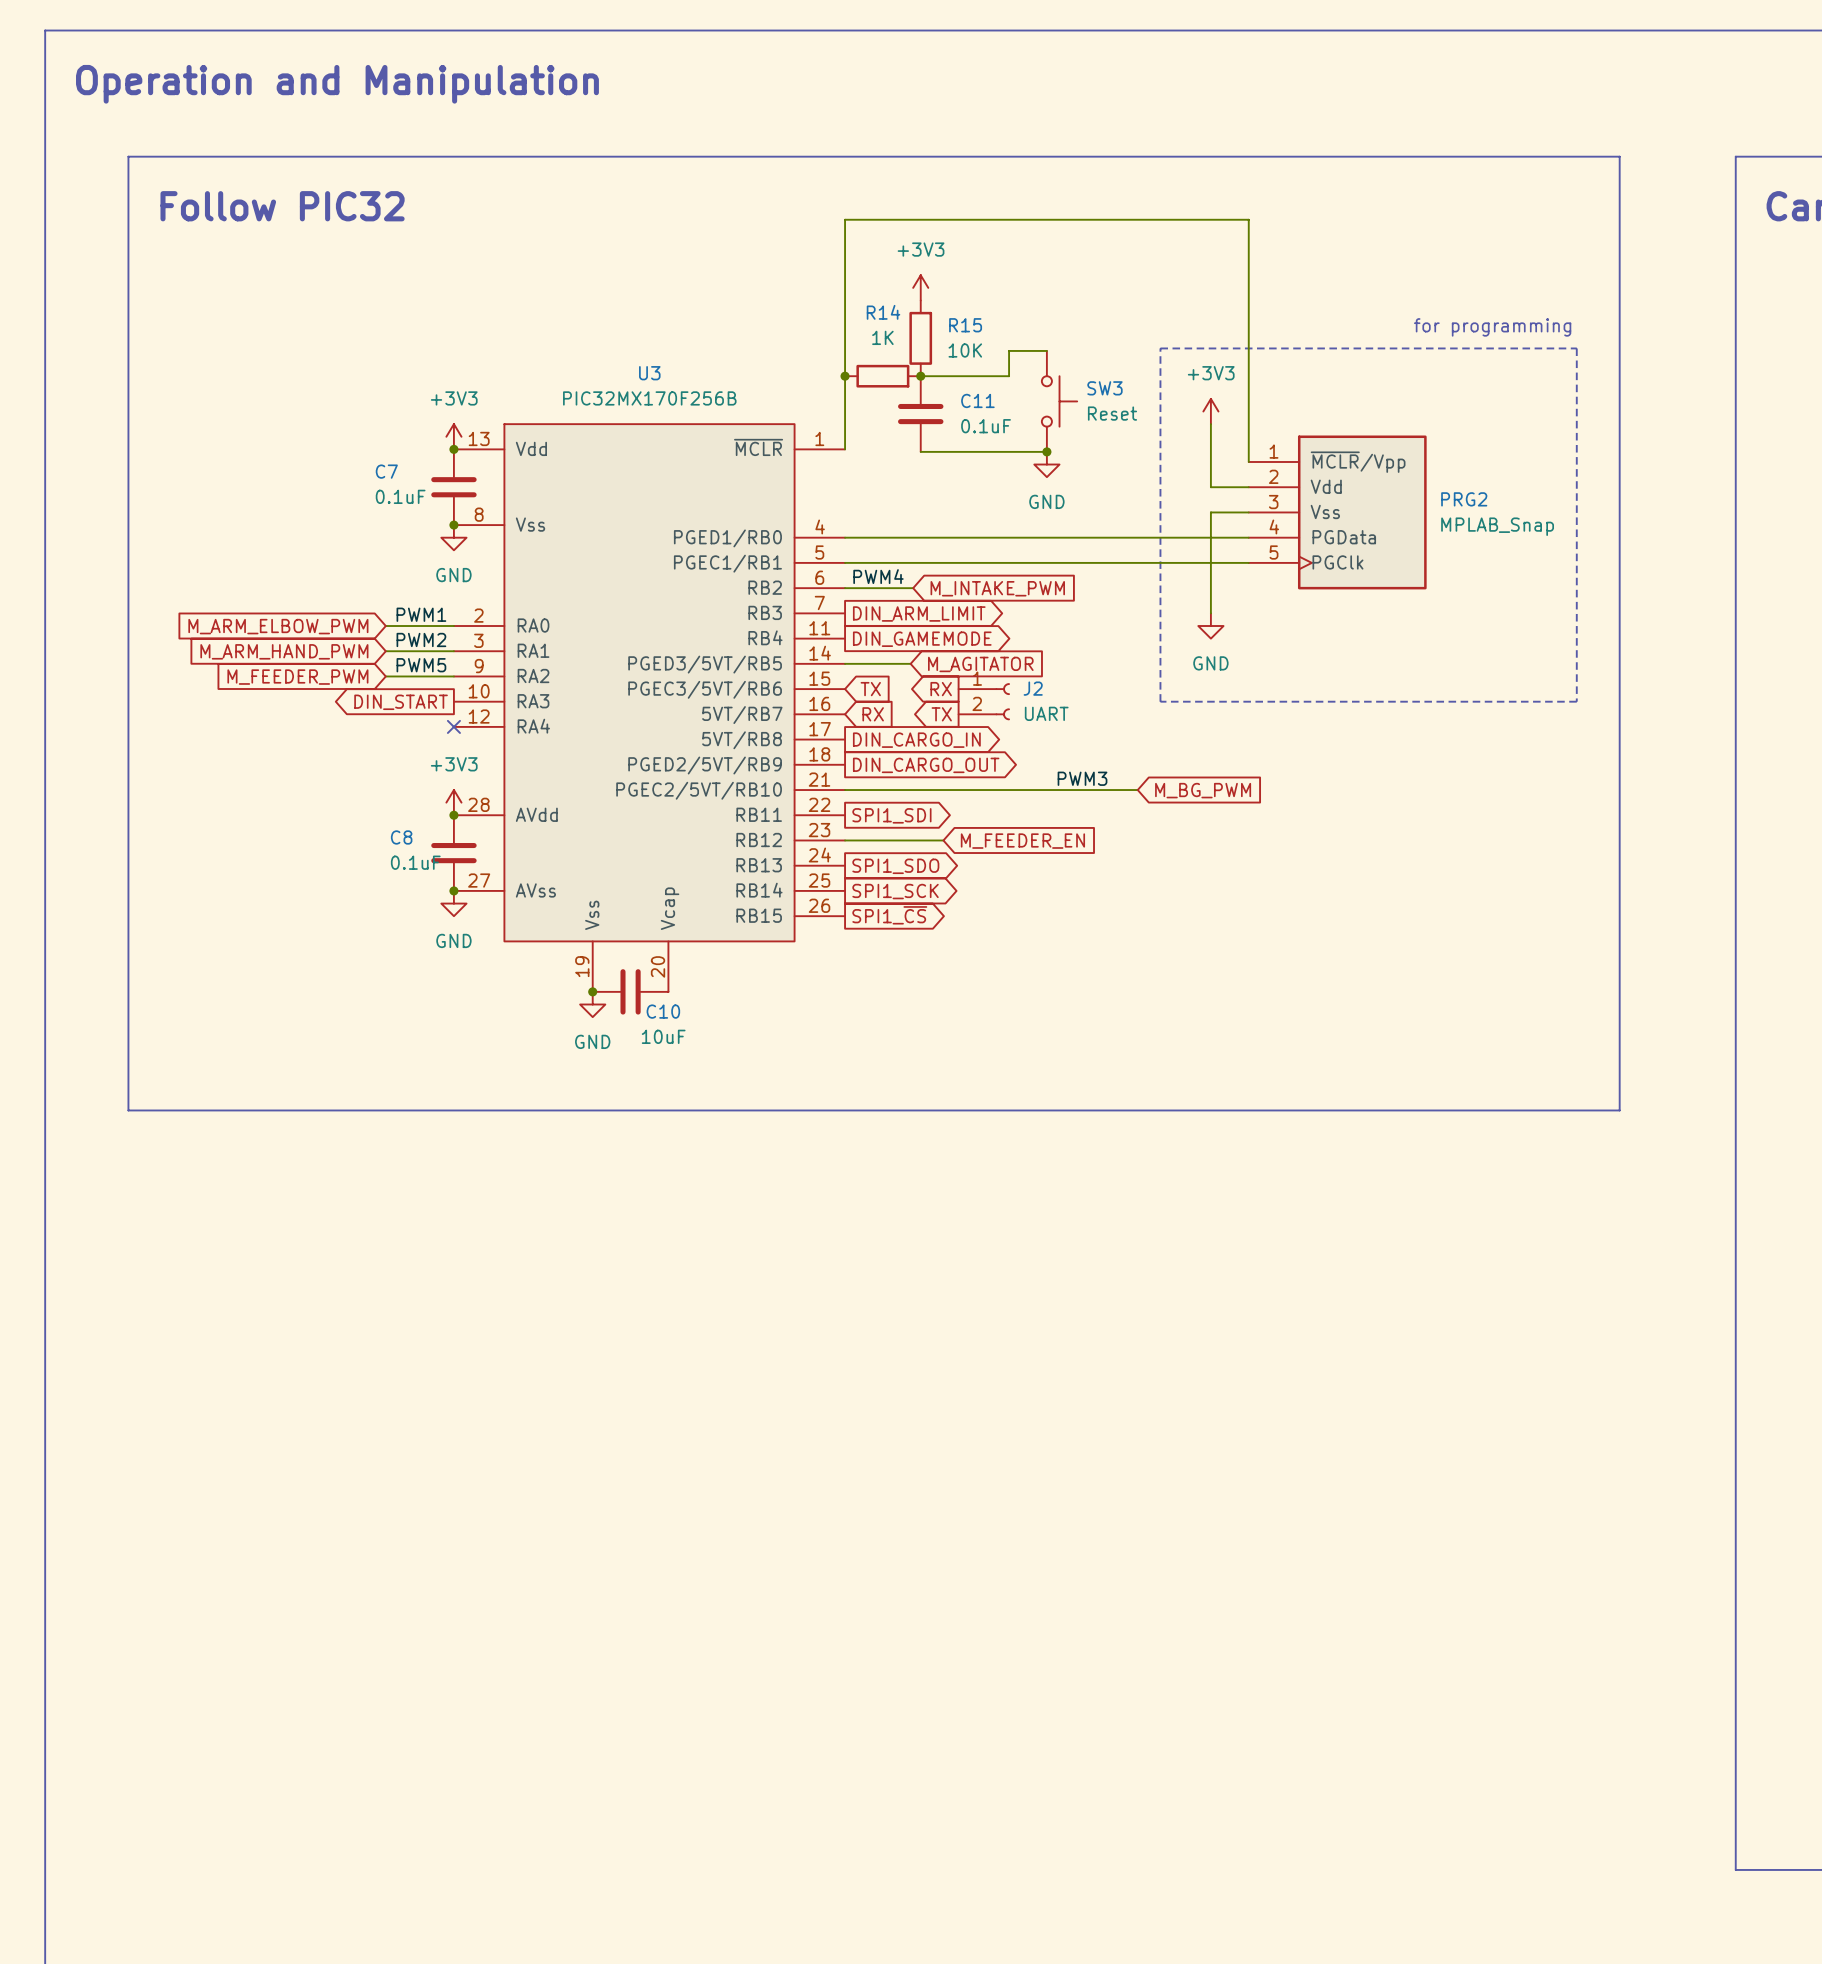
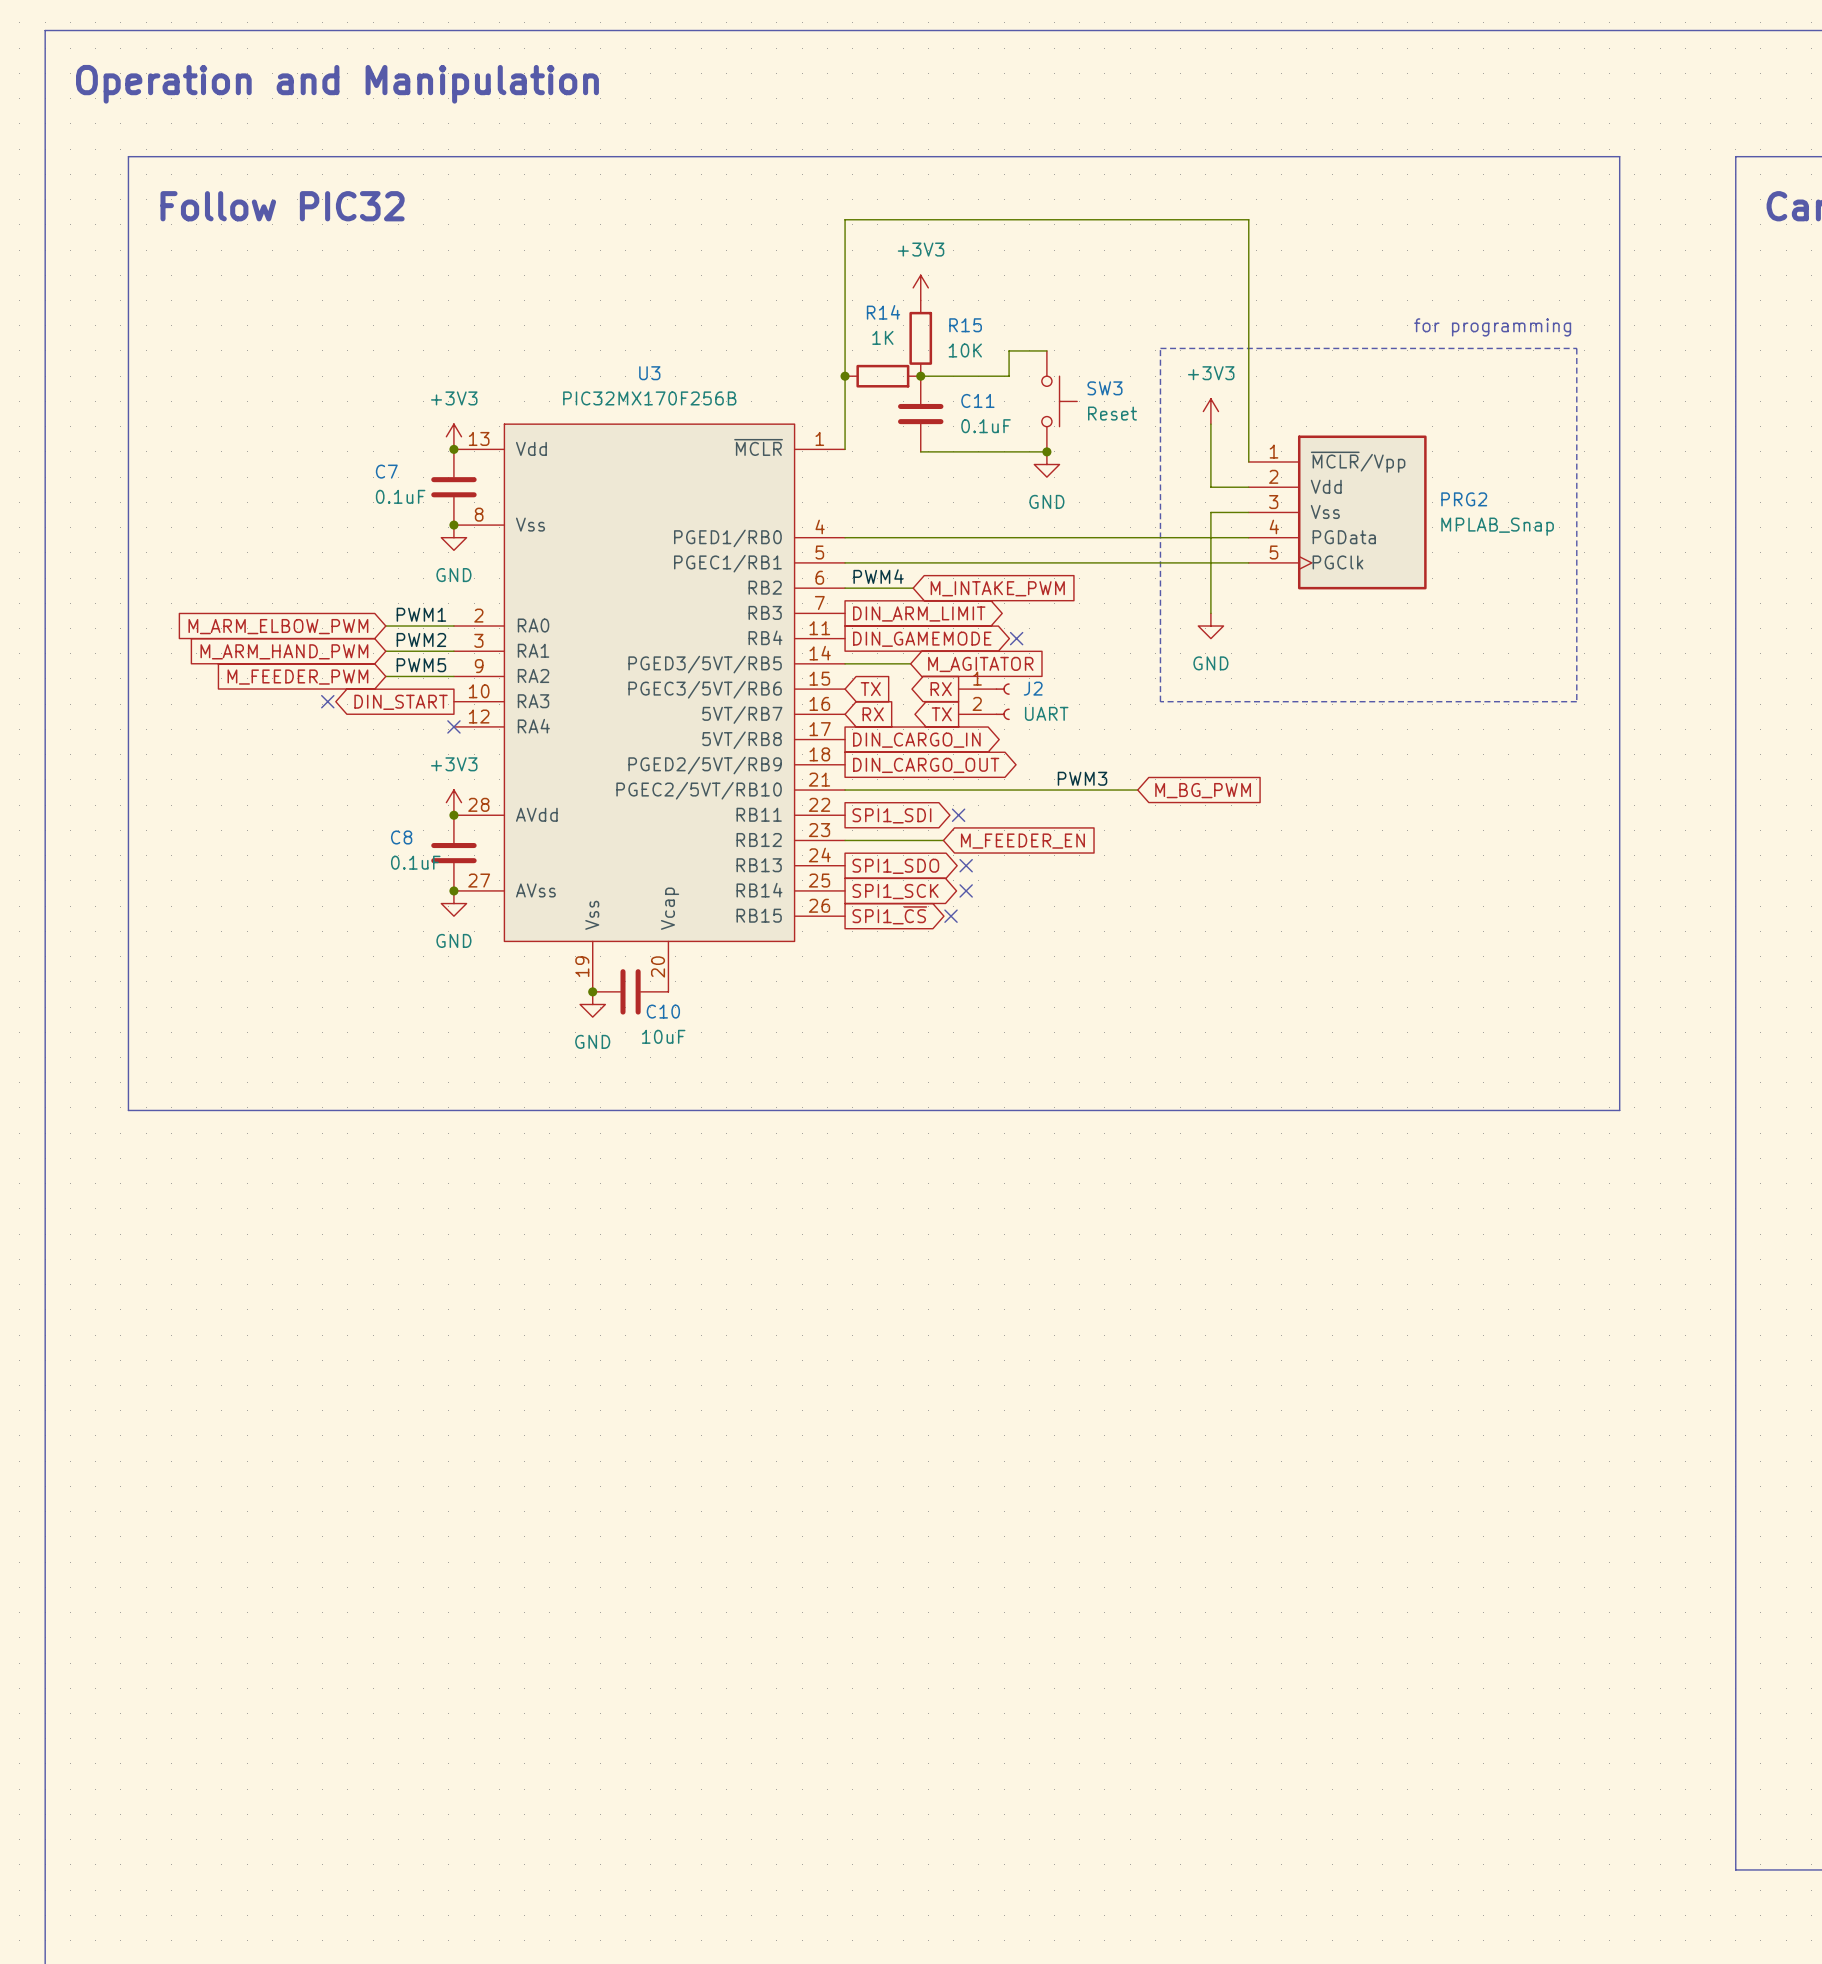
no-connect mark: none -> (1016, 638)
no-connect mark: none -> (327, 701)
no-connect mark: none -> (958, 815)
no-connect mark: none -> (966, 865)
no-connect mark: none -> (966, 890)
no-connect mark: none -> (951, 916)

